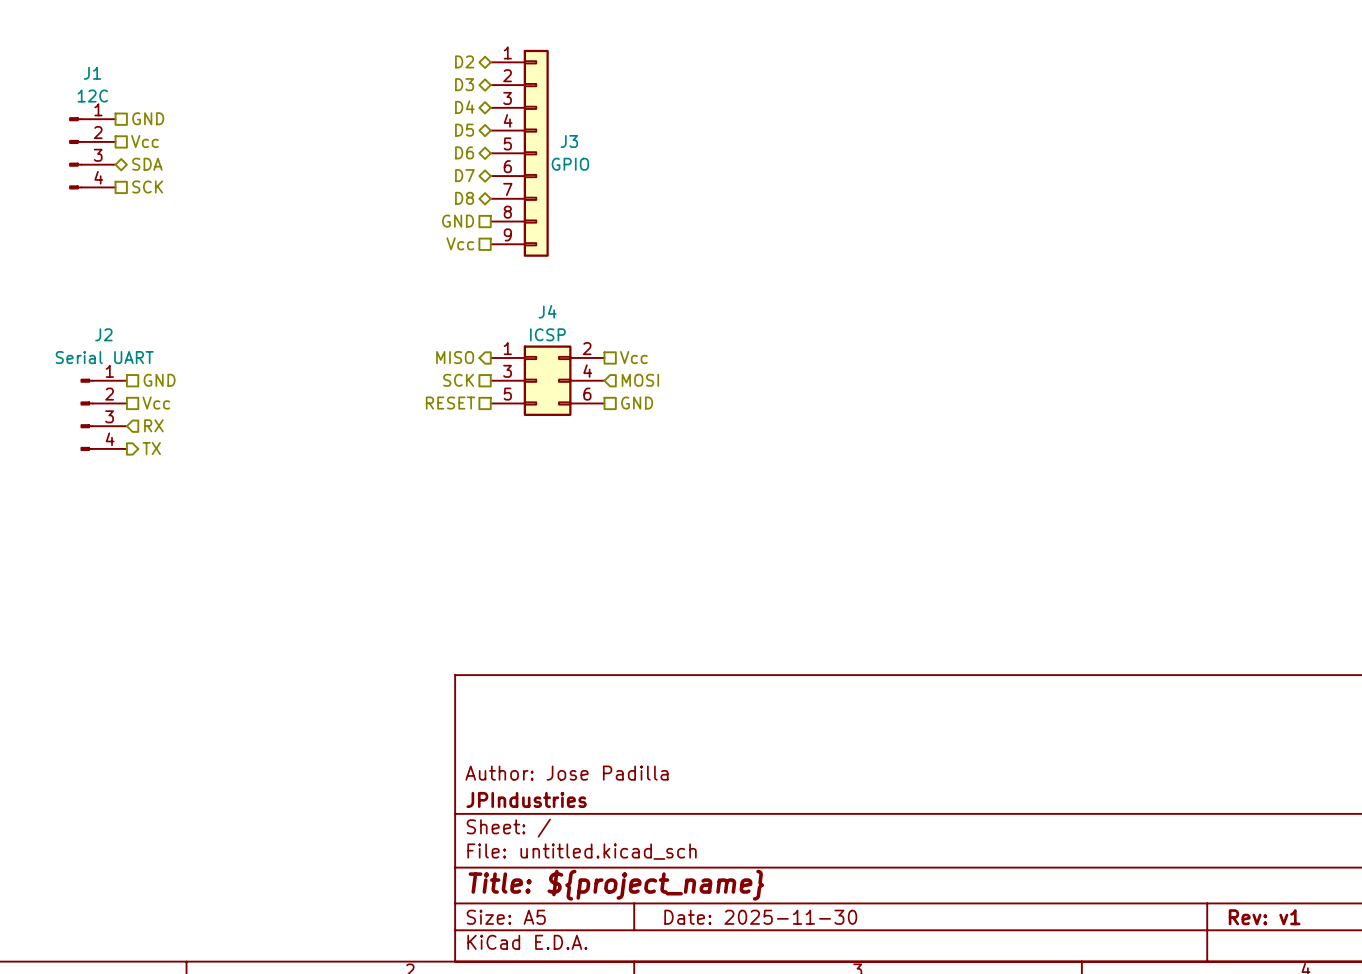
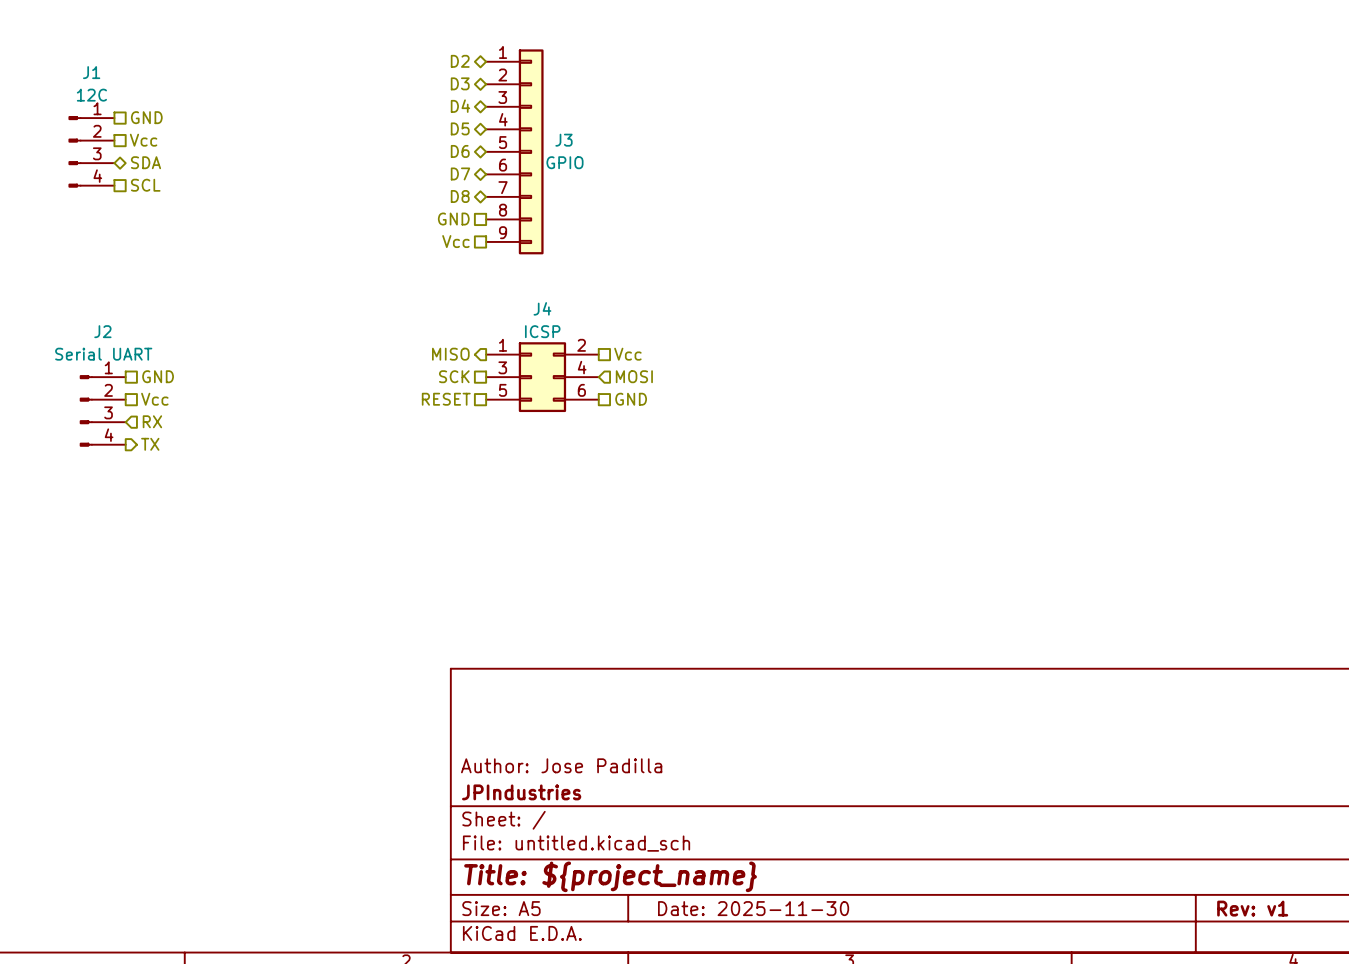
hierarchical label: SCK (147, 187) -> SCL (145, 185)

